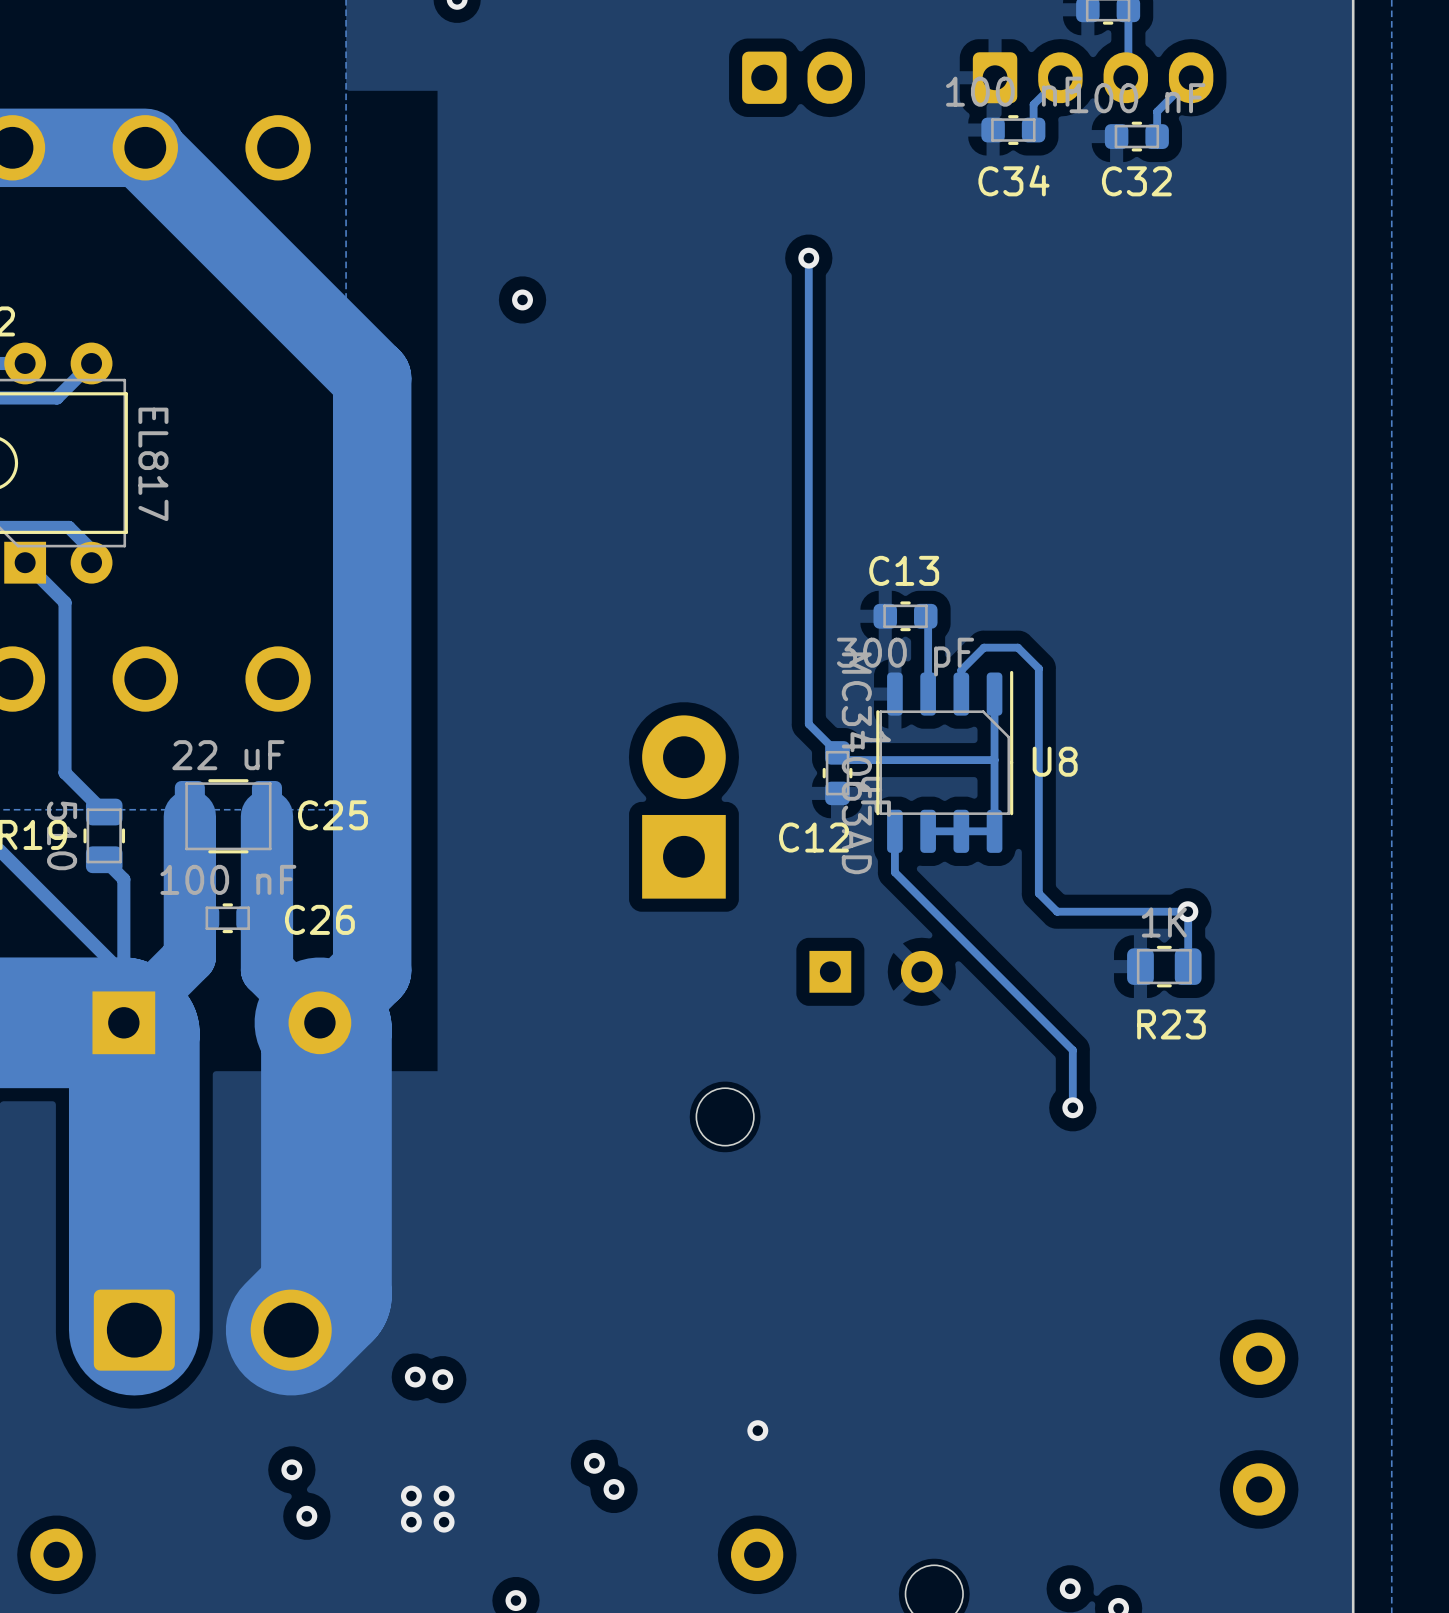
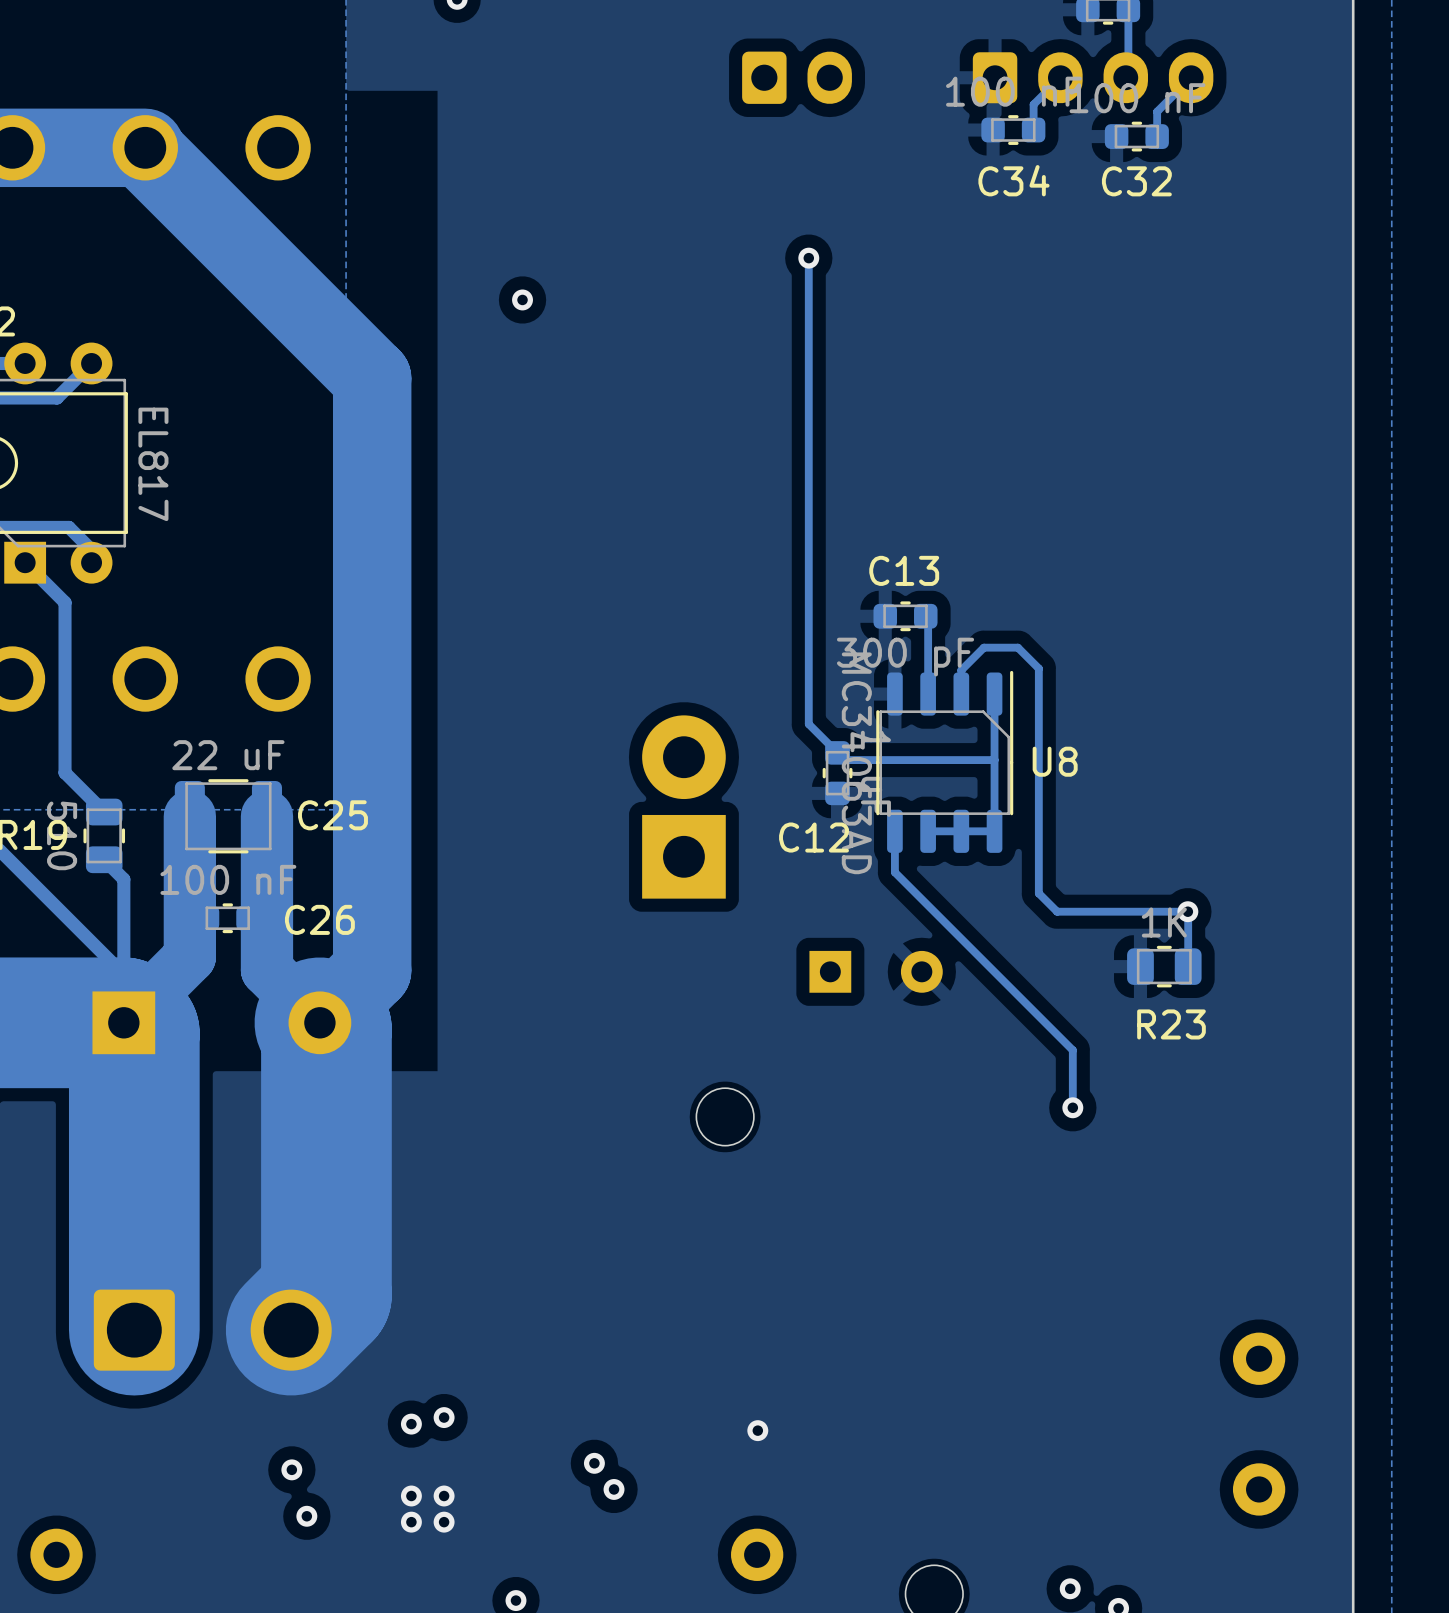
via: (415, 1377) -> none
via: (442, 1379) -> none
via: none -> (444, 1417)
via: none -> (411, 1424)

